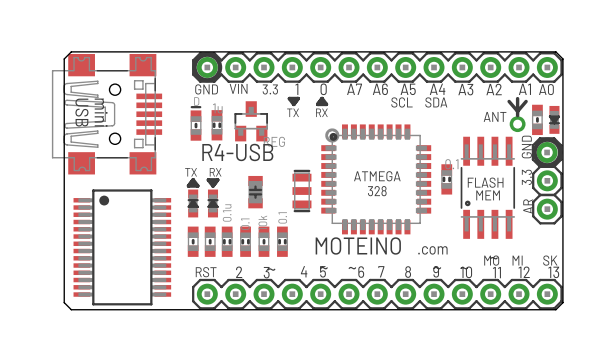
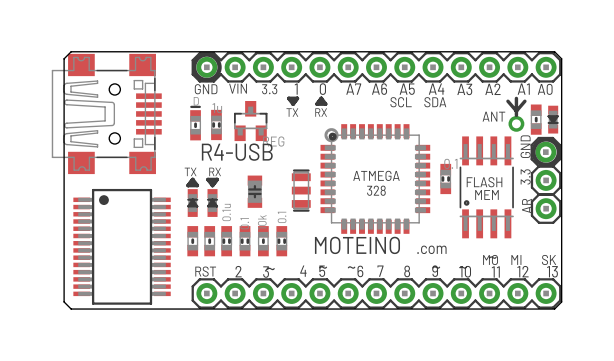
text: USB (81, 112) -> none
text: mini (101, 112) -> none

